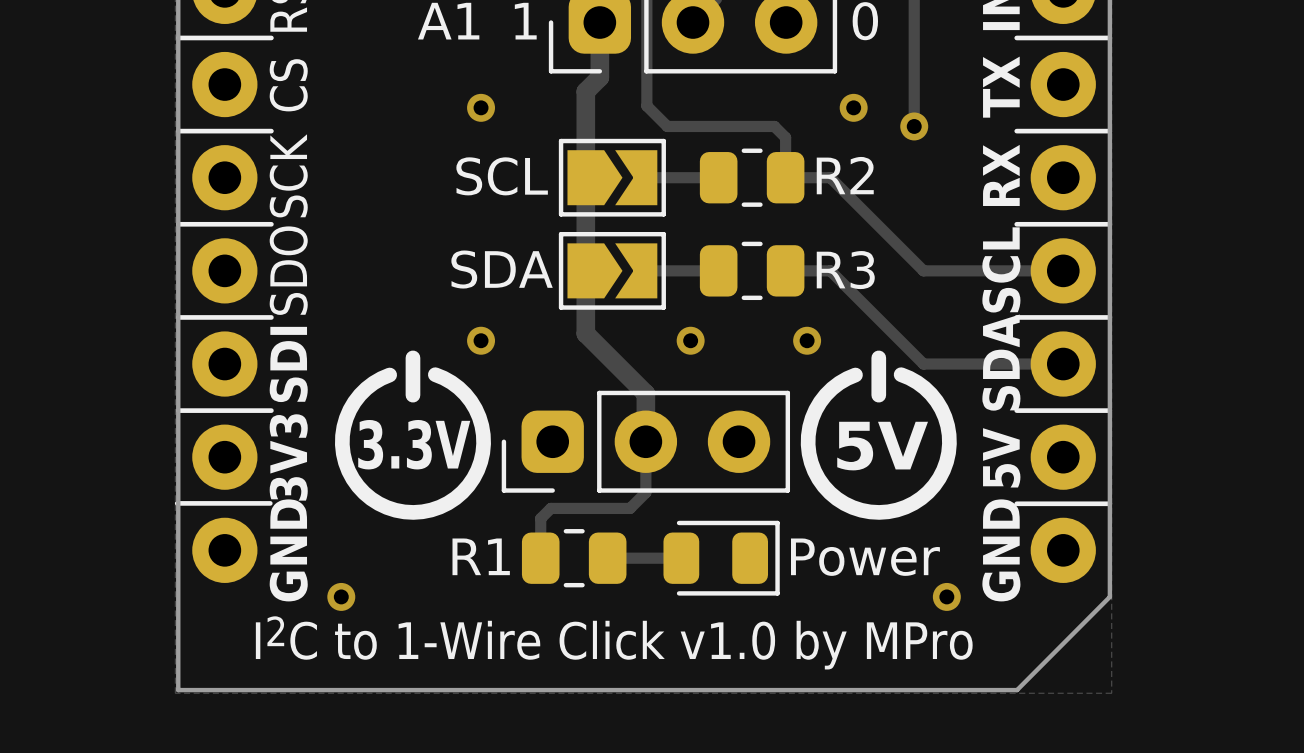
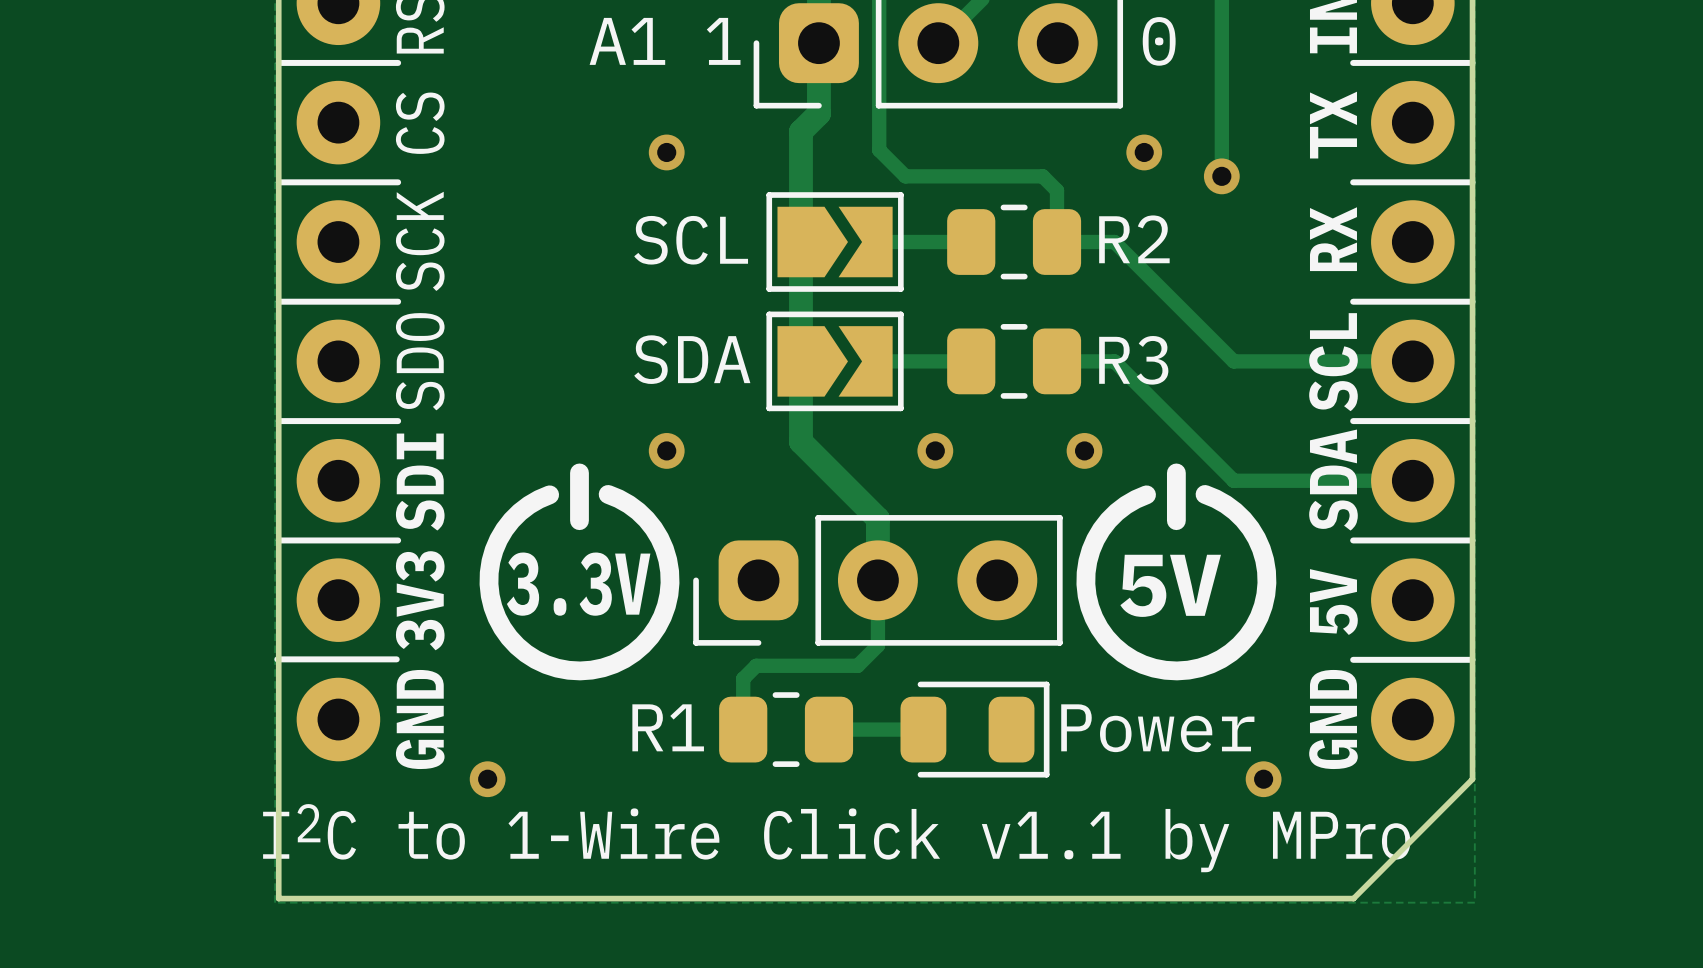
part value: I2C to 1-Wire Click v1.0 by MPro (614, 642) -> I2C to 1-Wire Click v1.1 by MPro (836, 838)

